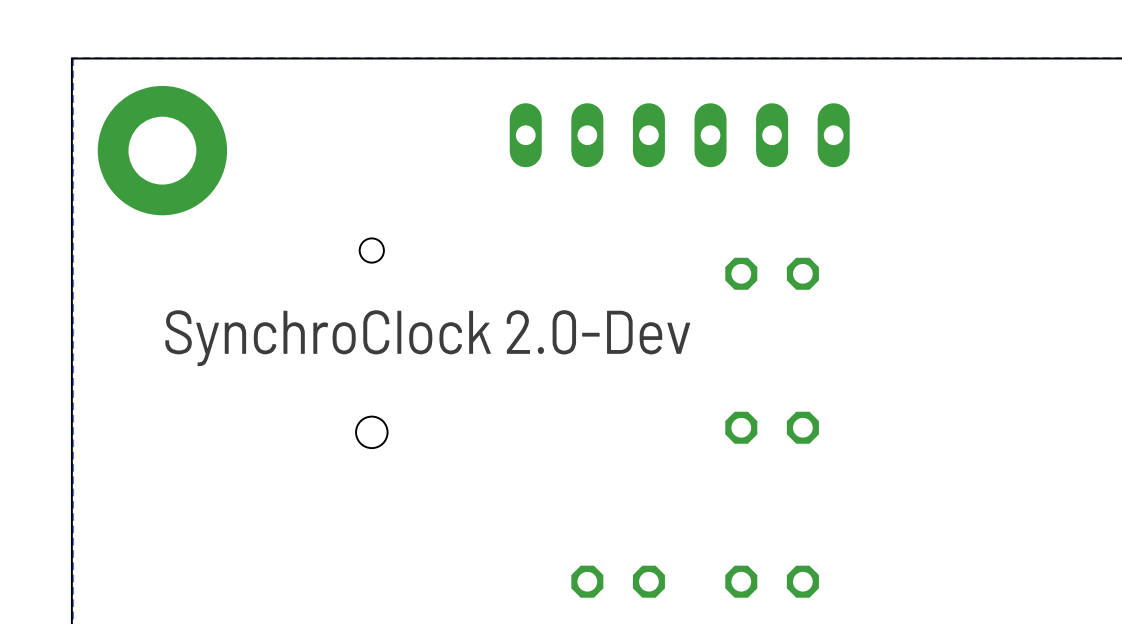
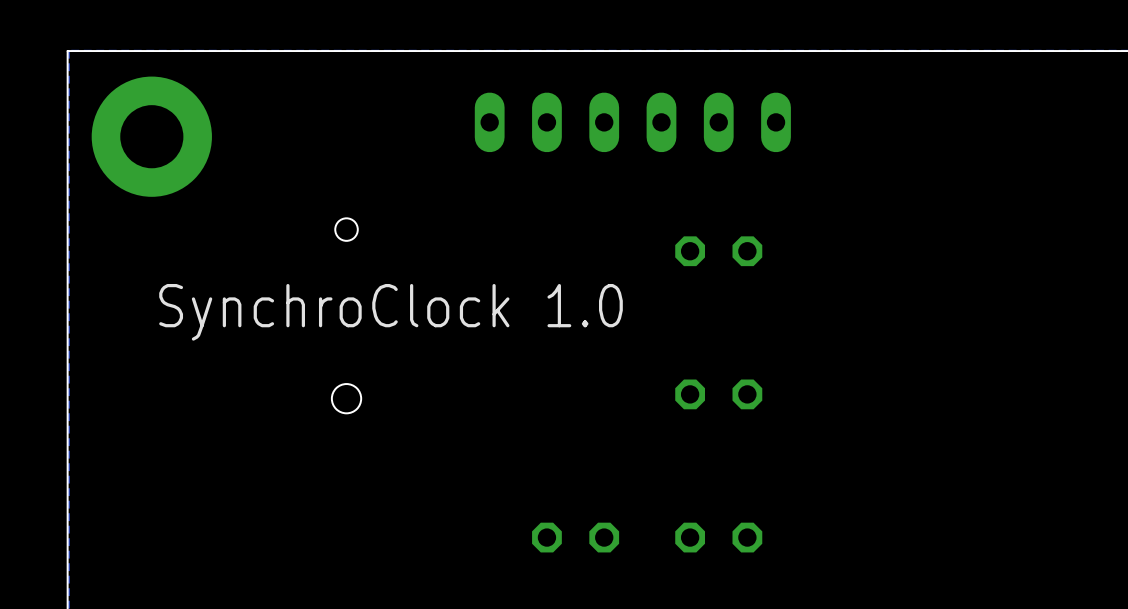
text: SynchroClock 2.0-Dev (427, 338) -> SynchroClock 1.0 (391, 312)

